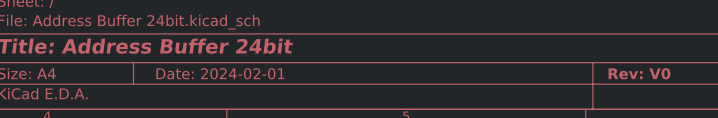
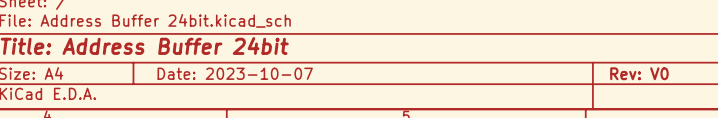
title block: Date: 2024-02-01 (220, 73) -> Date: 2023-10-07 (235, 73)

